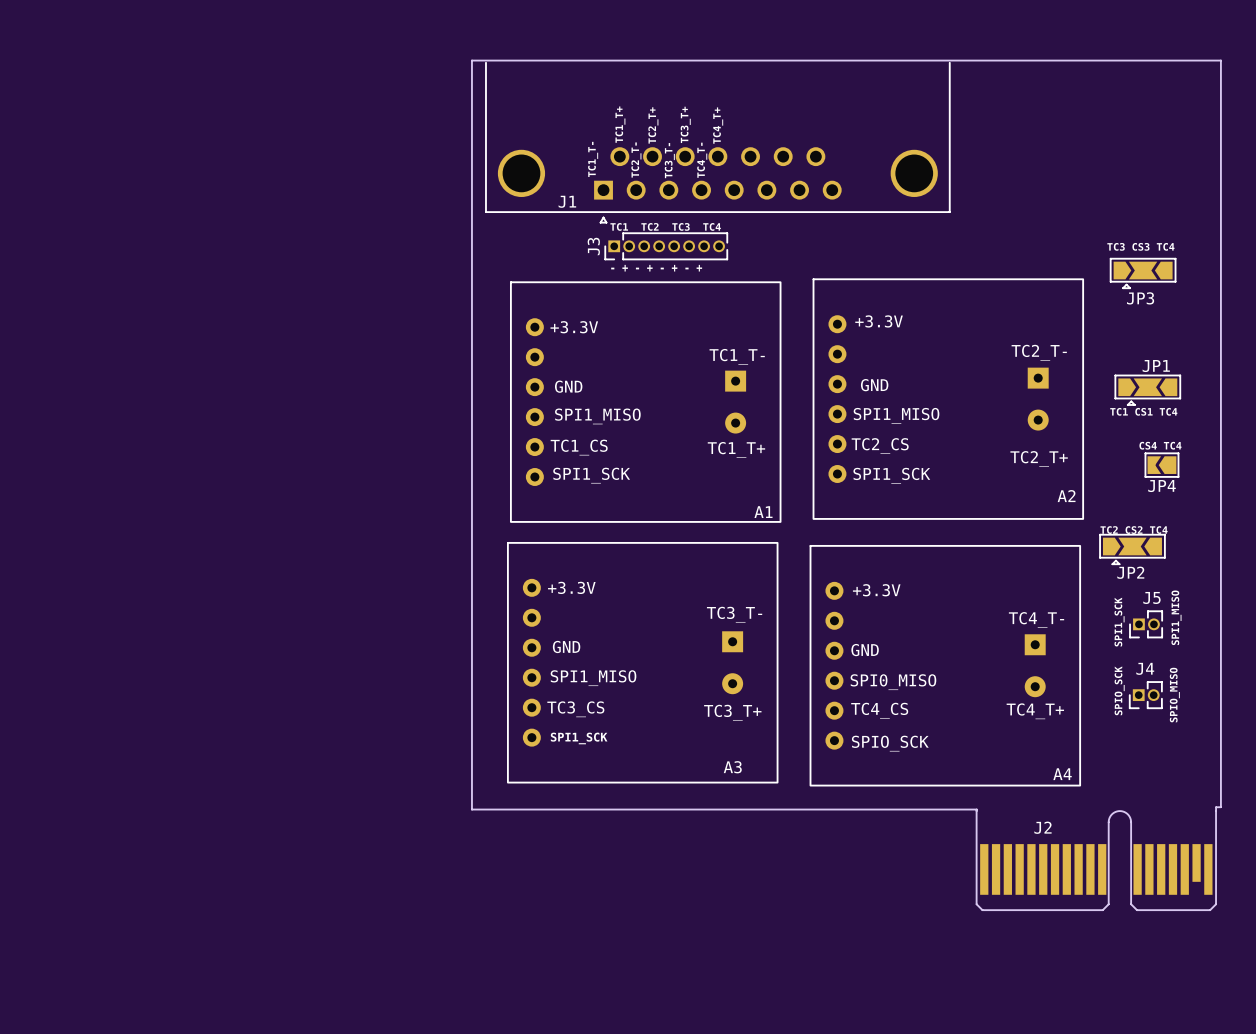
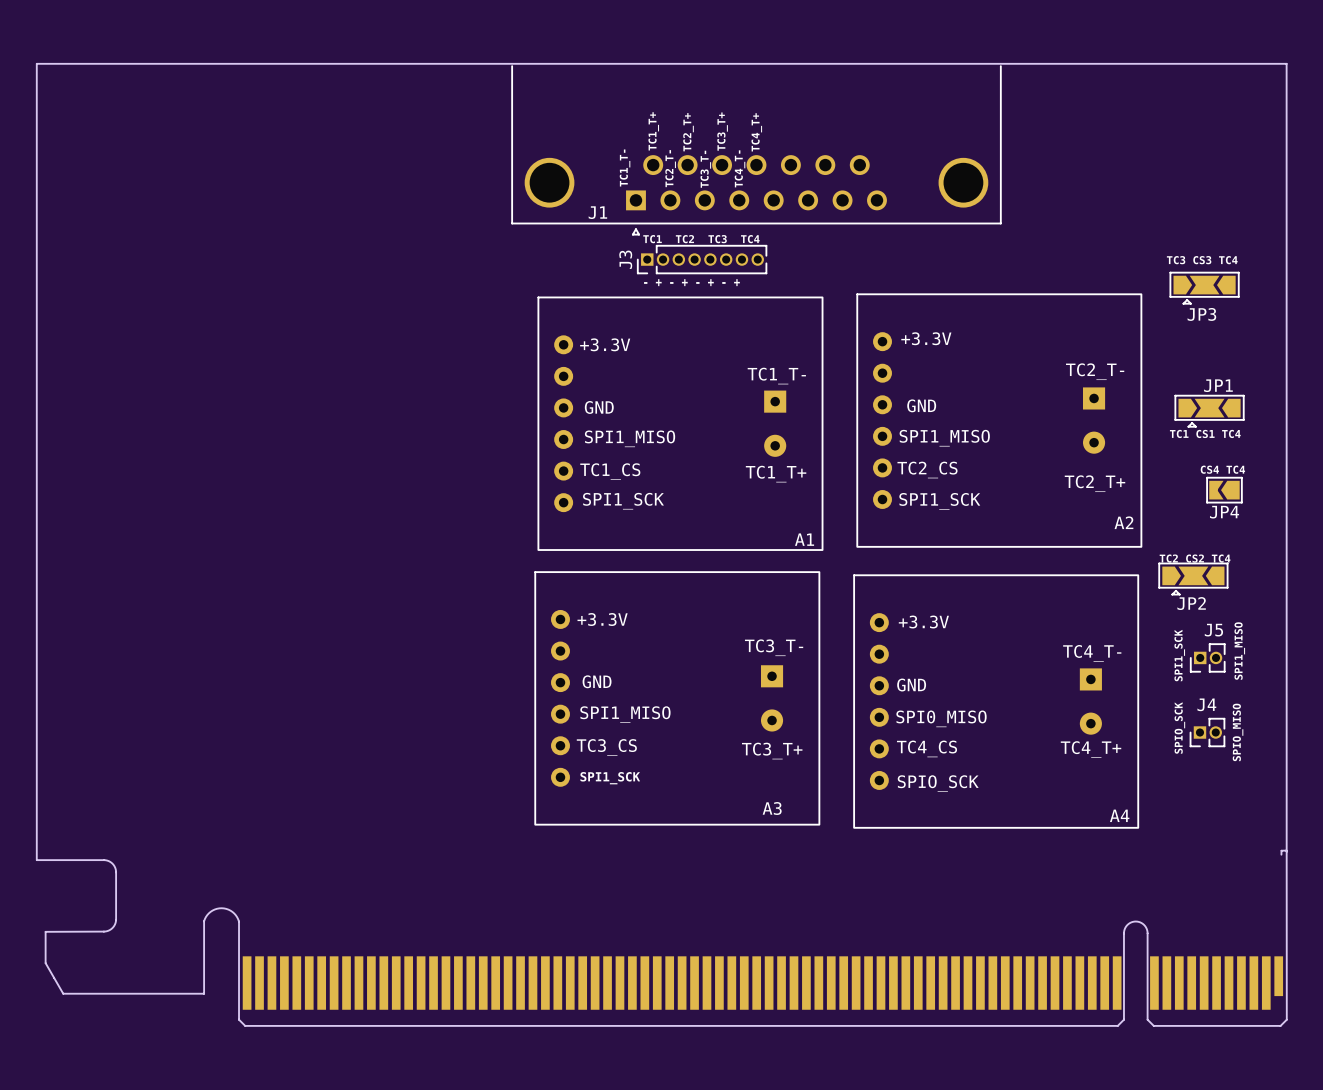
board edge: (471, 60) (471, 809) (976, 809) (976, 811) -> (497, 63) (36, 63) (36, 860)
J2: (1096, 860) -> none
part: none -> (661, 938)

